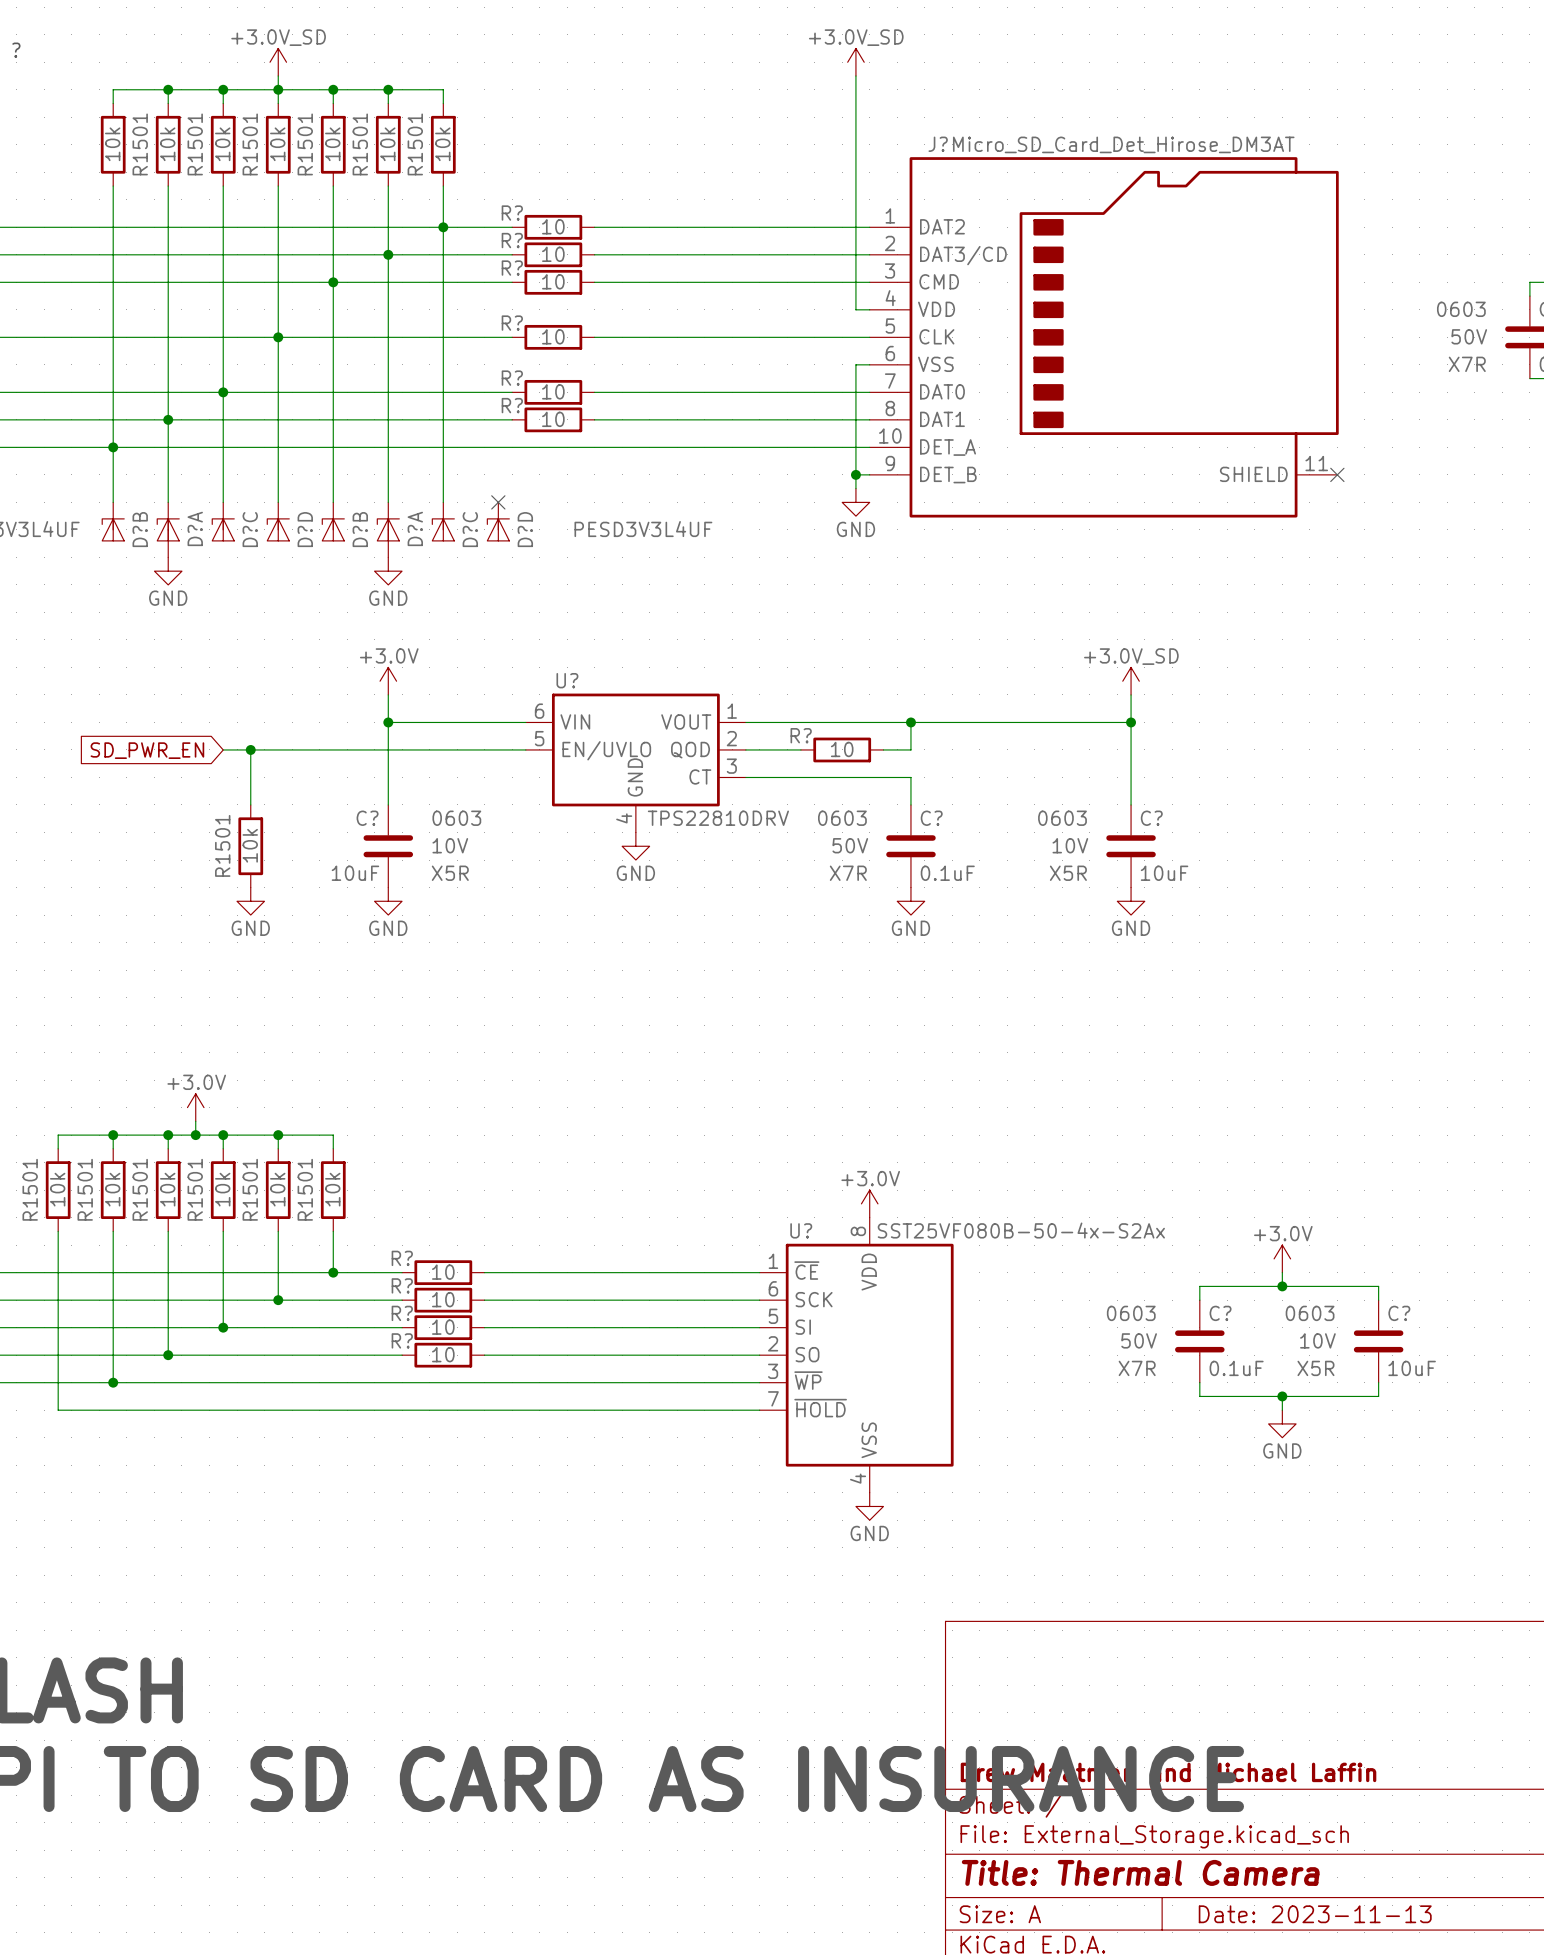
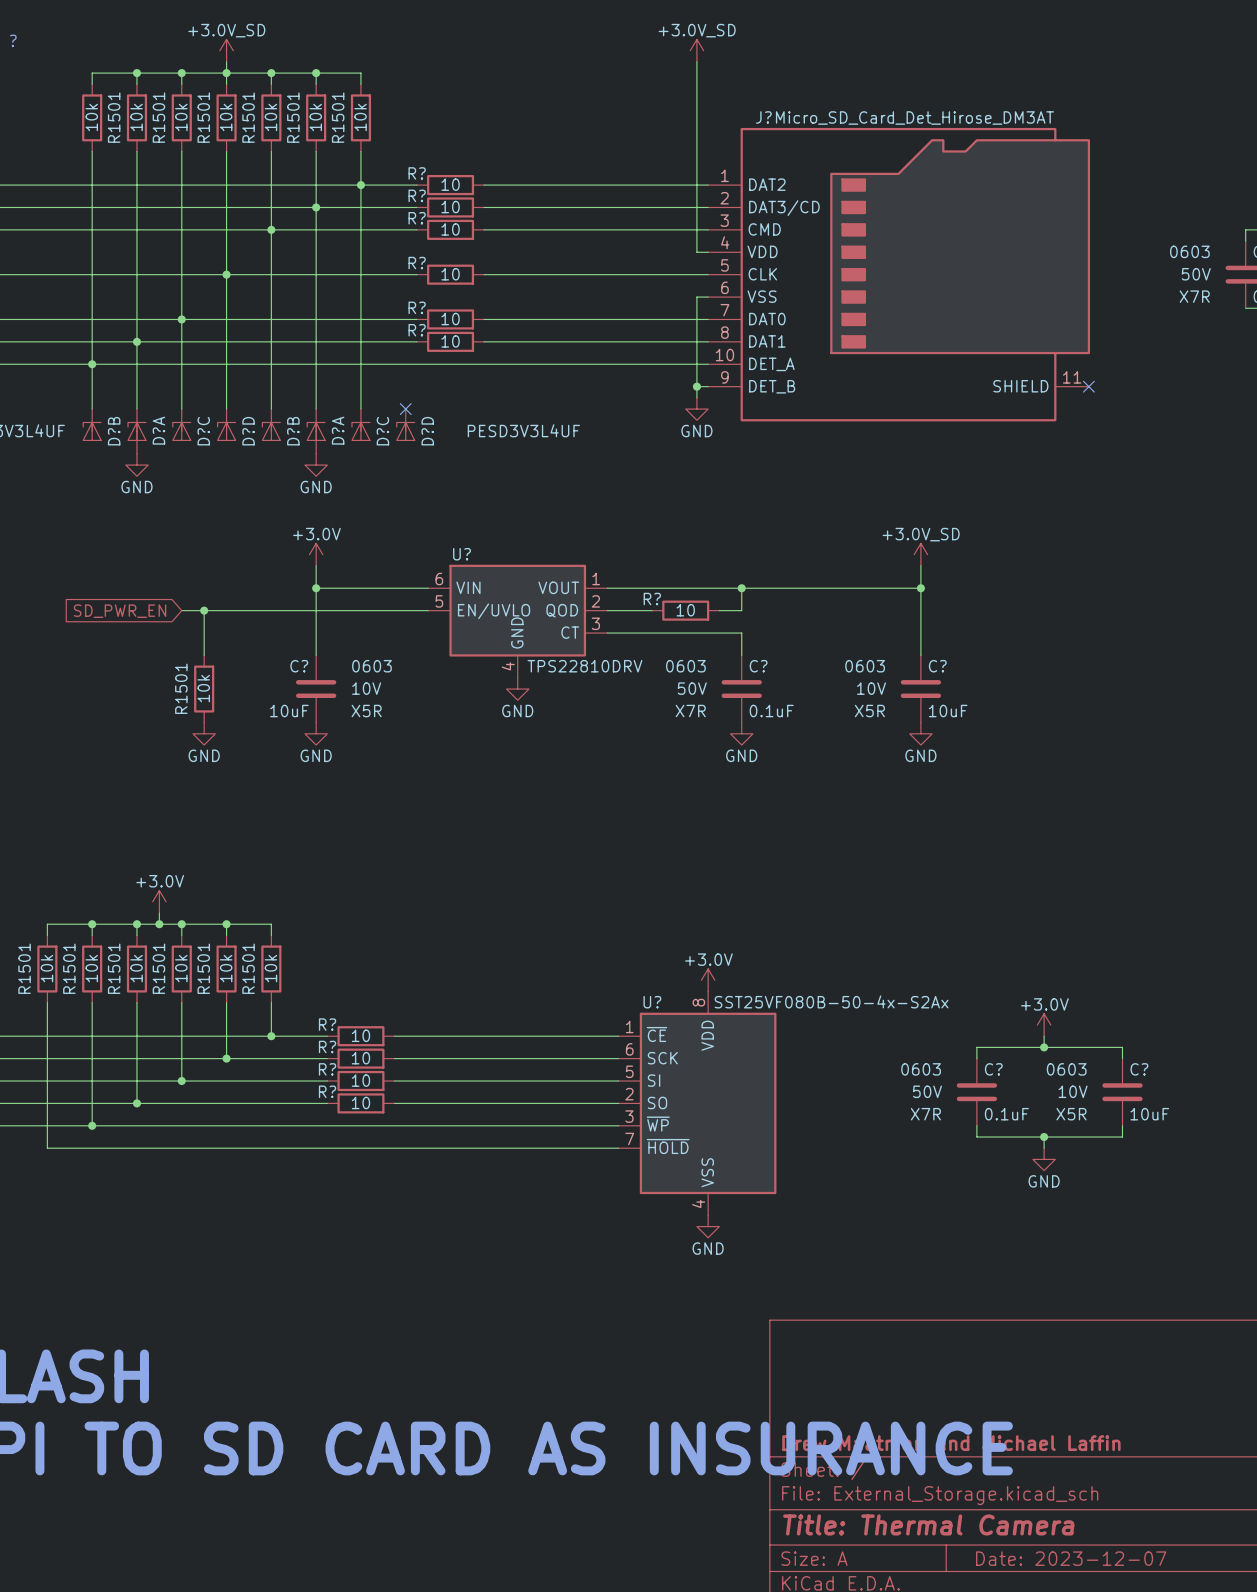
title block: Date: 2023-11-13 (1315, 1914) -> Date: 2023-12-07 (1071, 1558)

